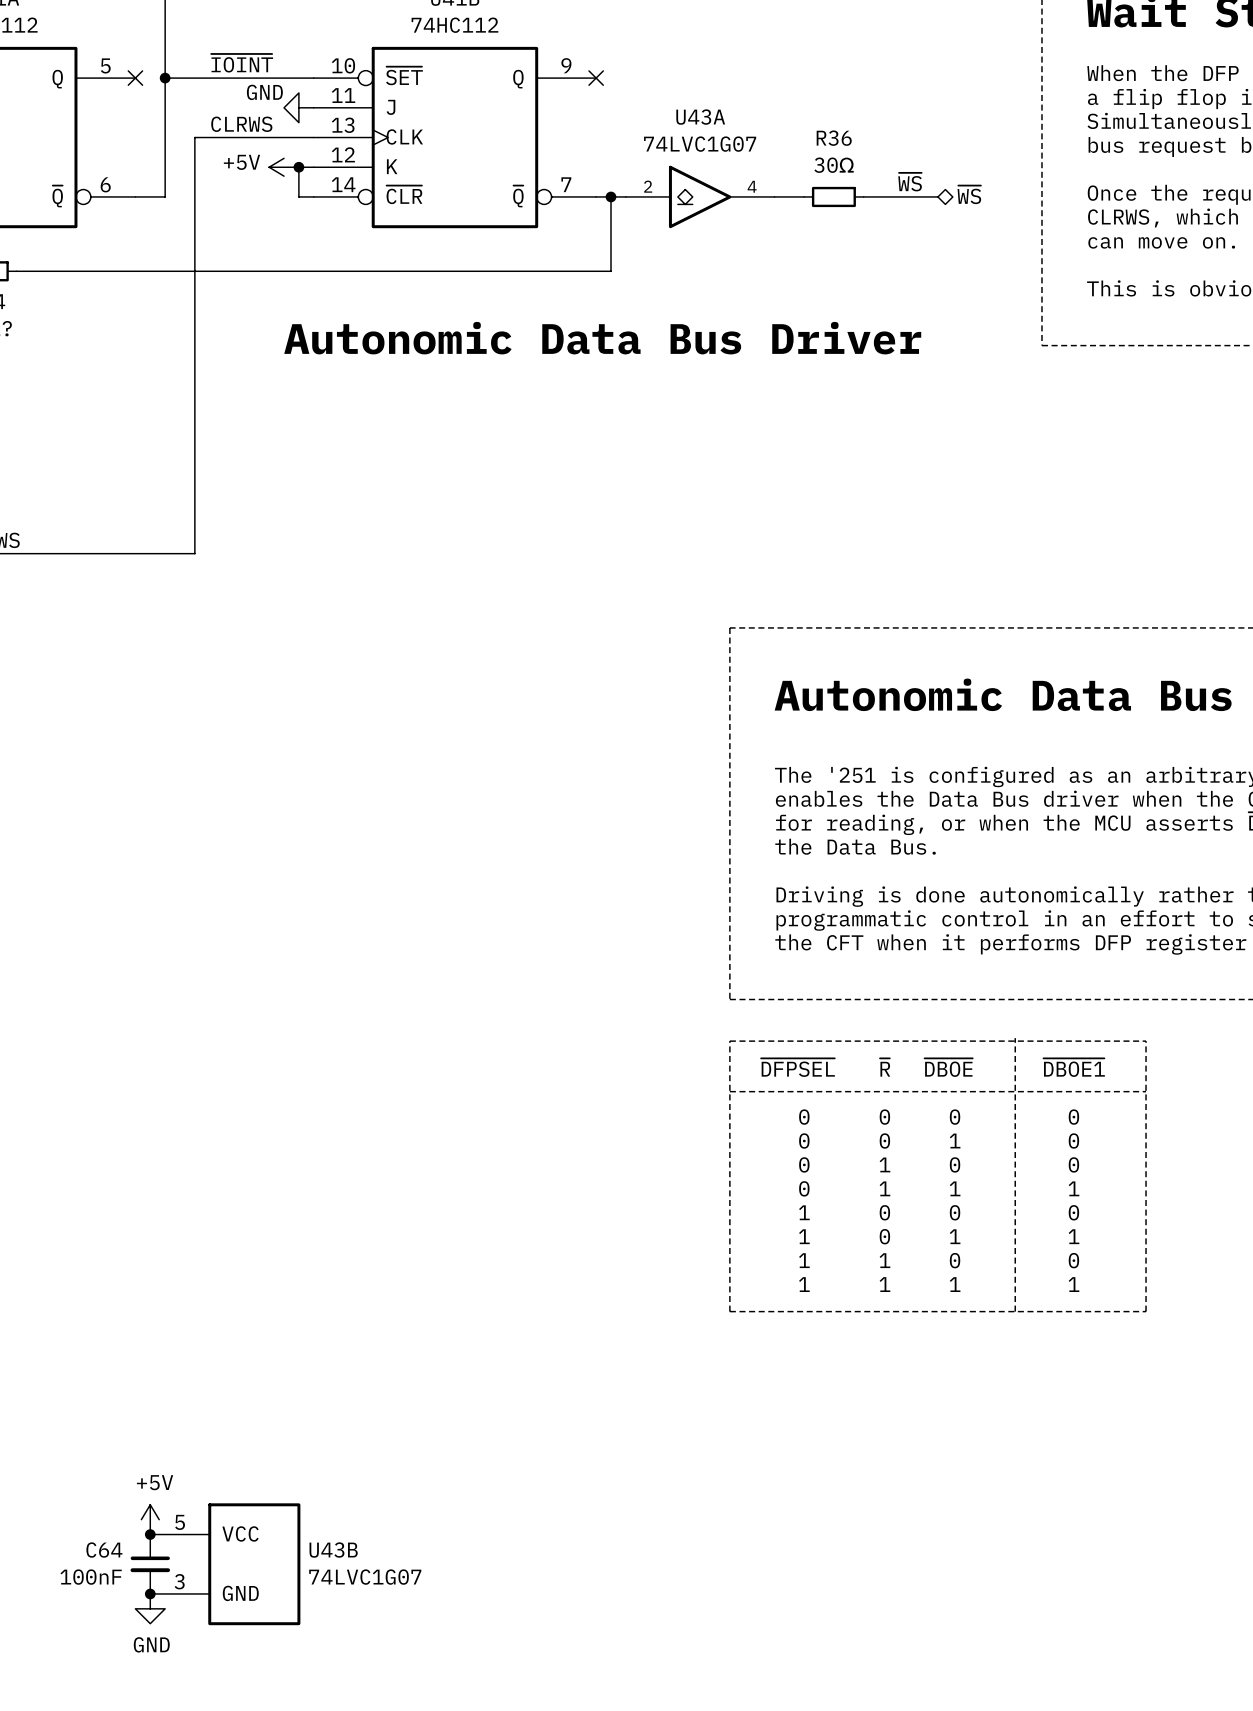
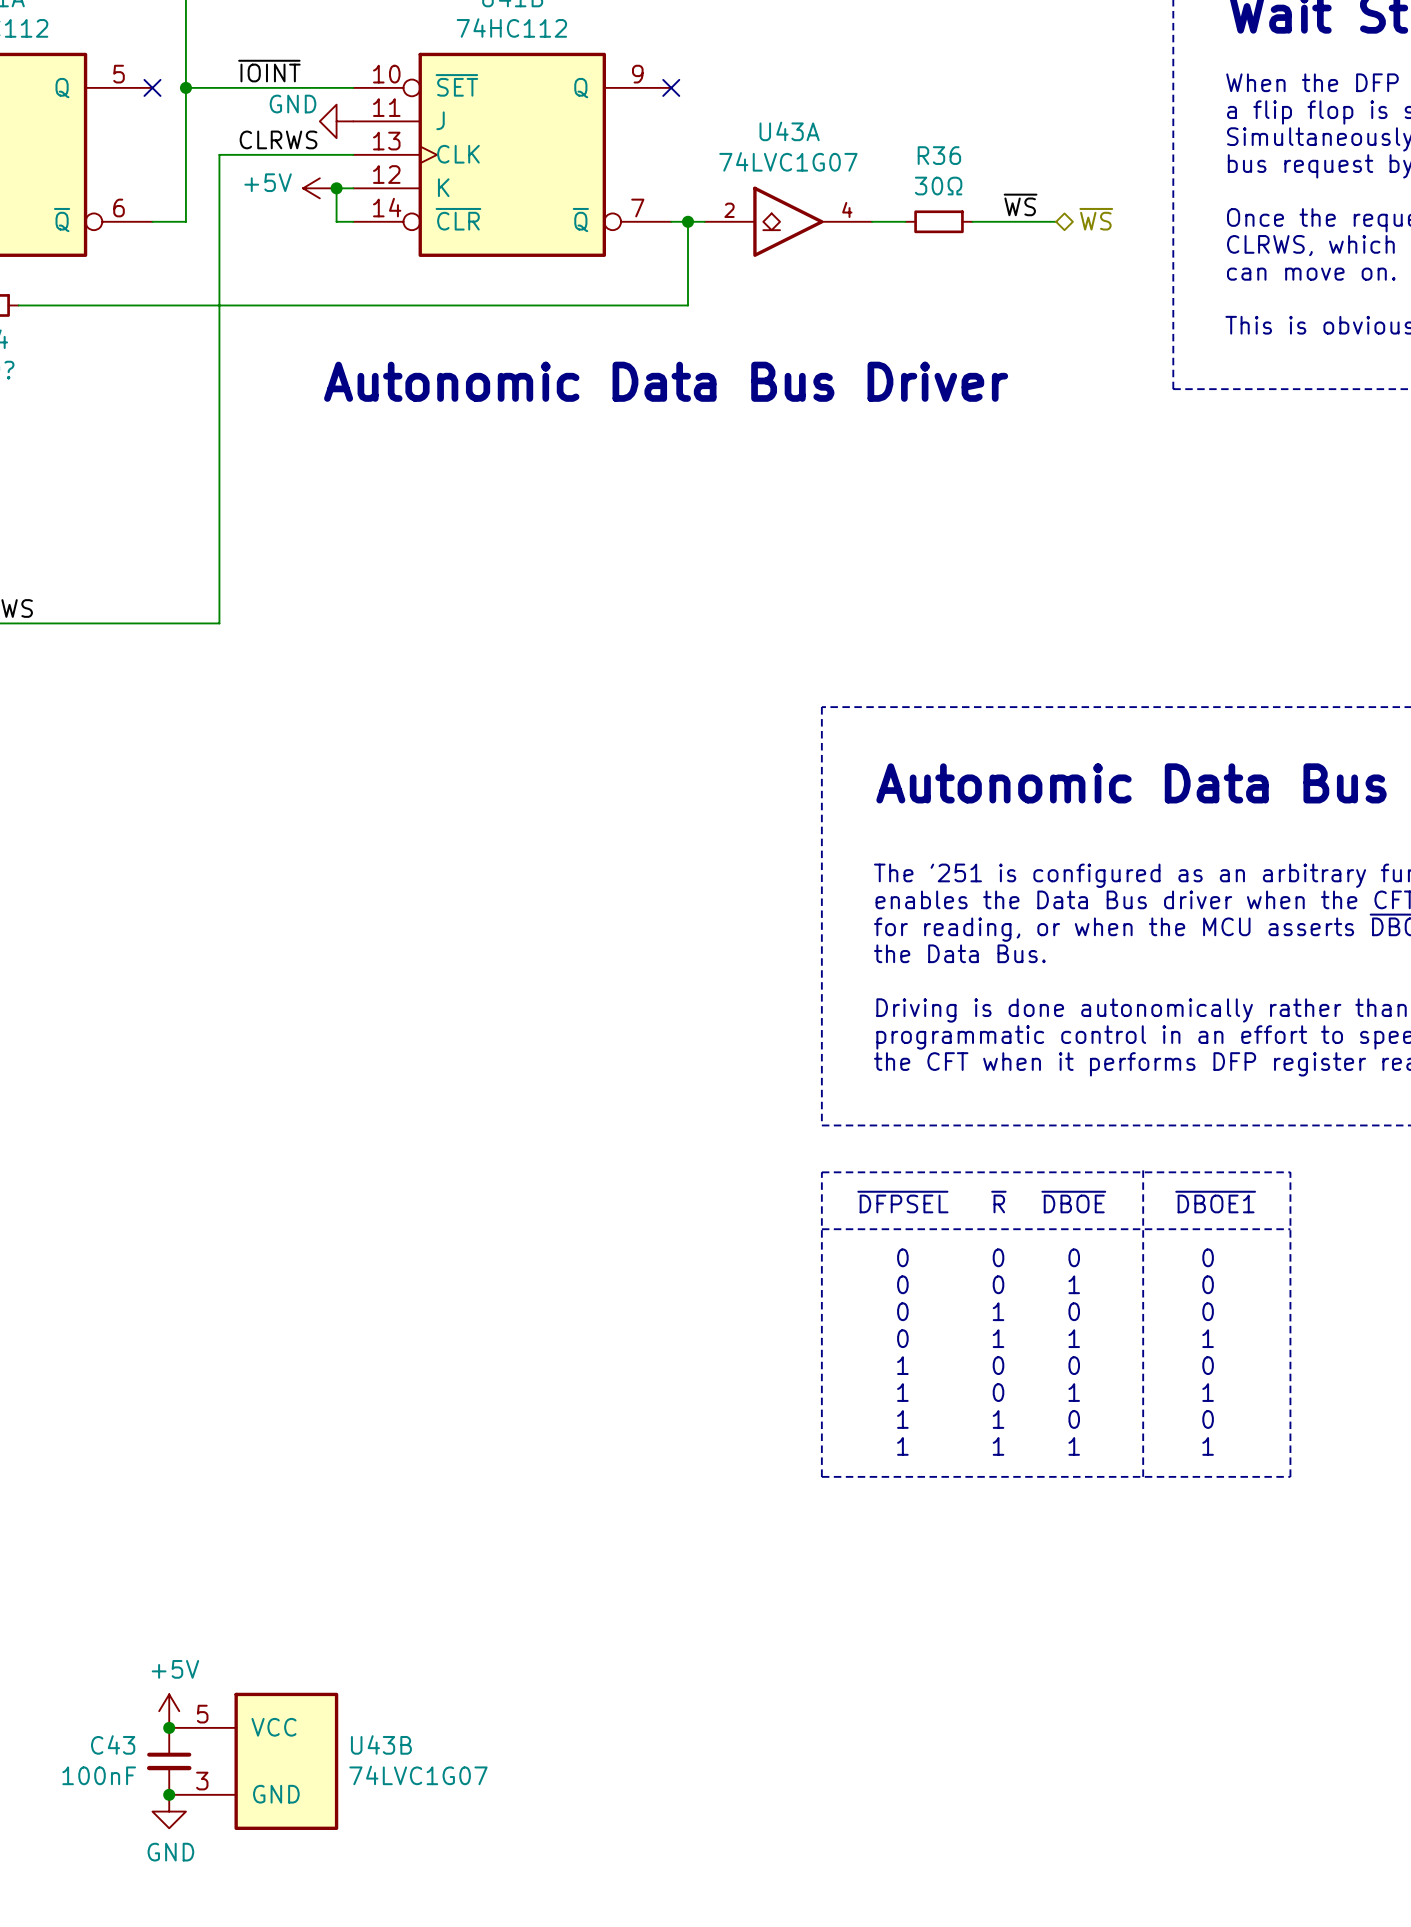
C64 name: C64 (104, 1550) -> C43 (113, 1744)

